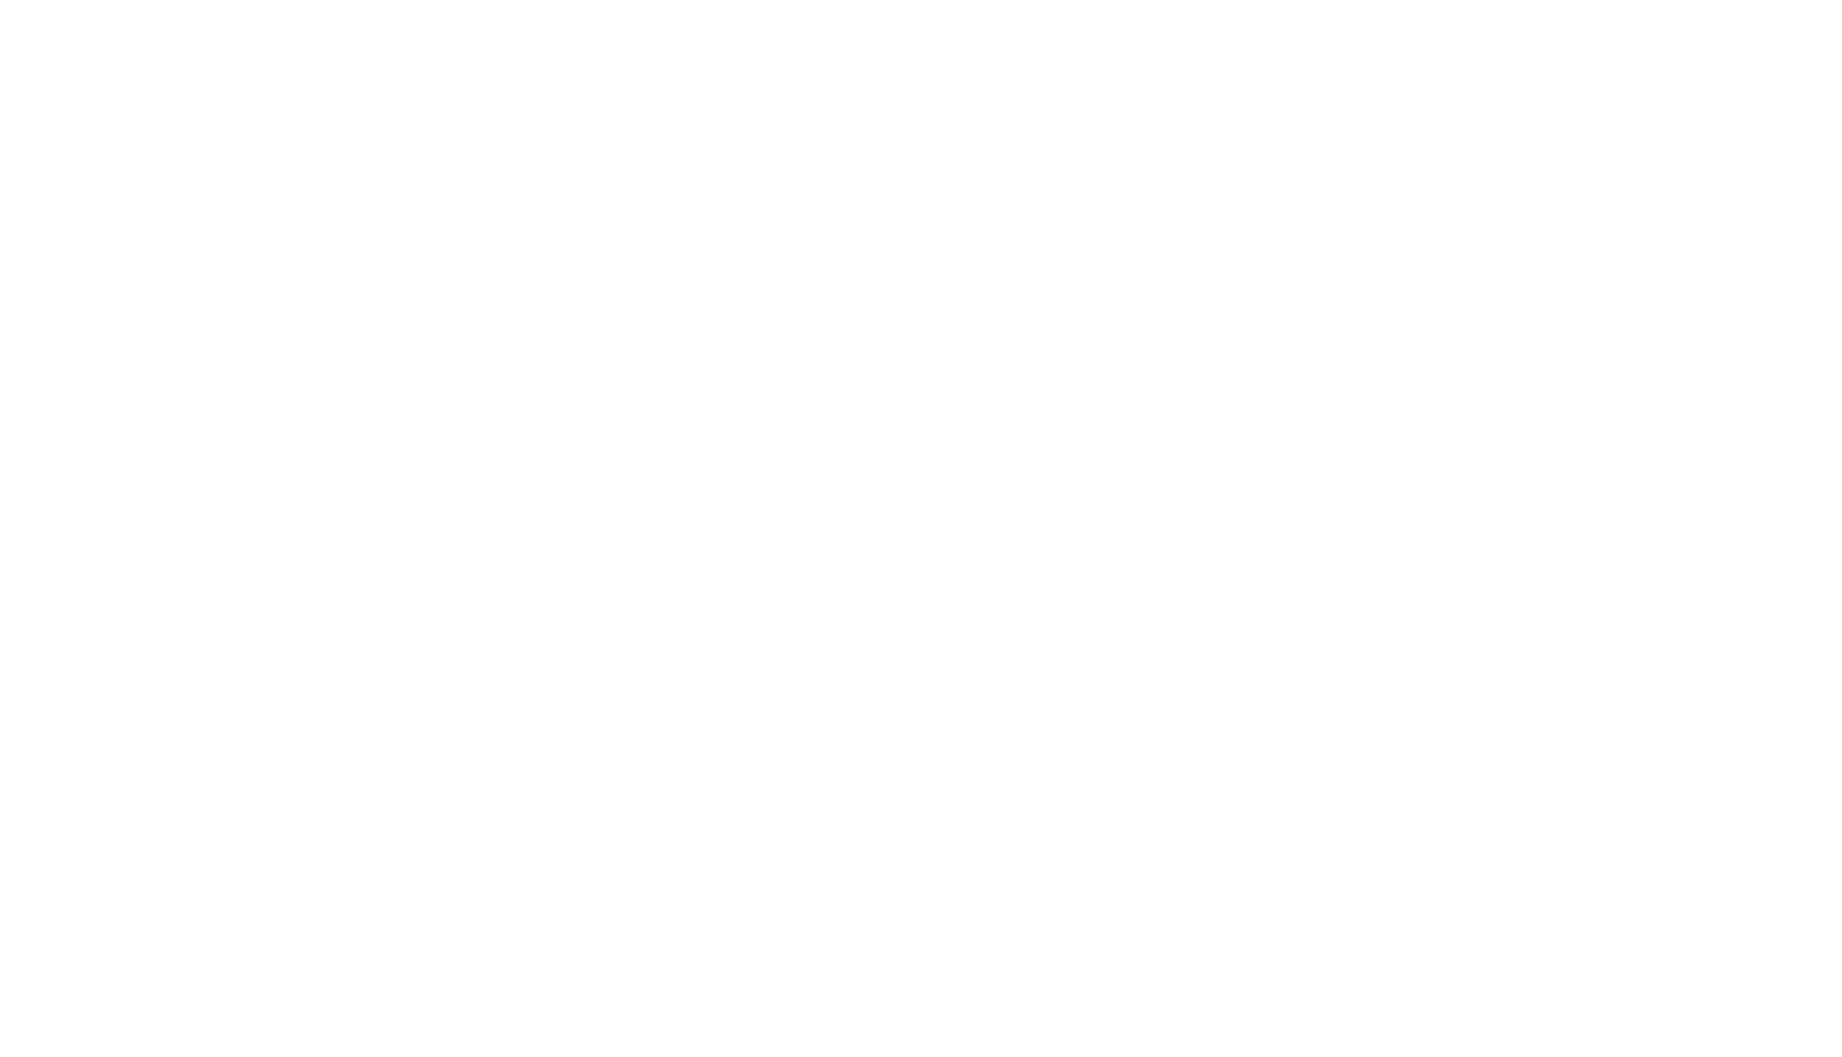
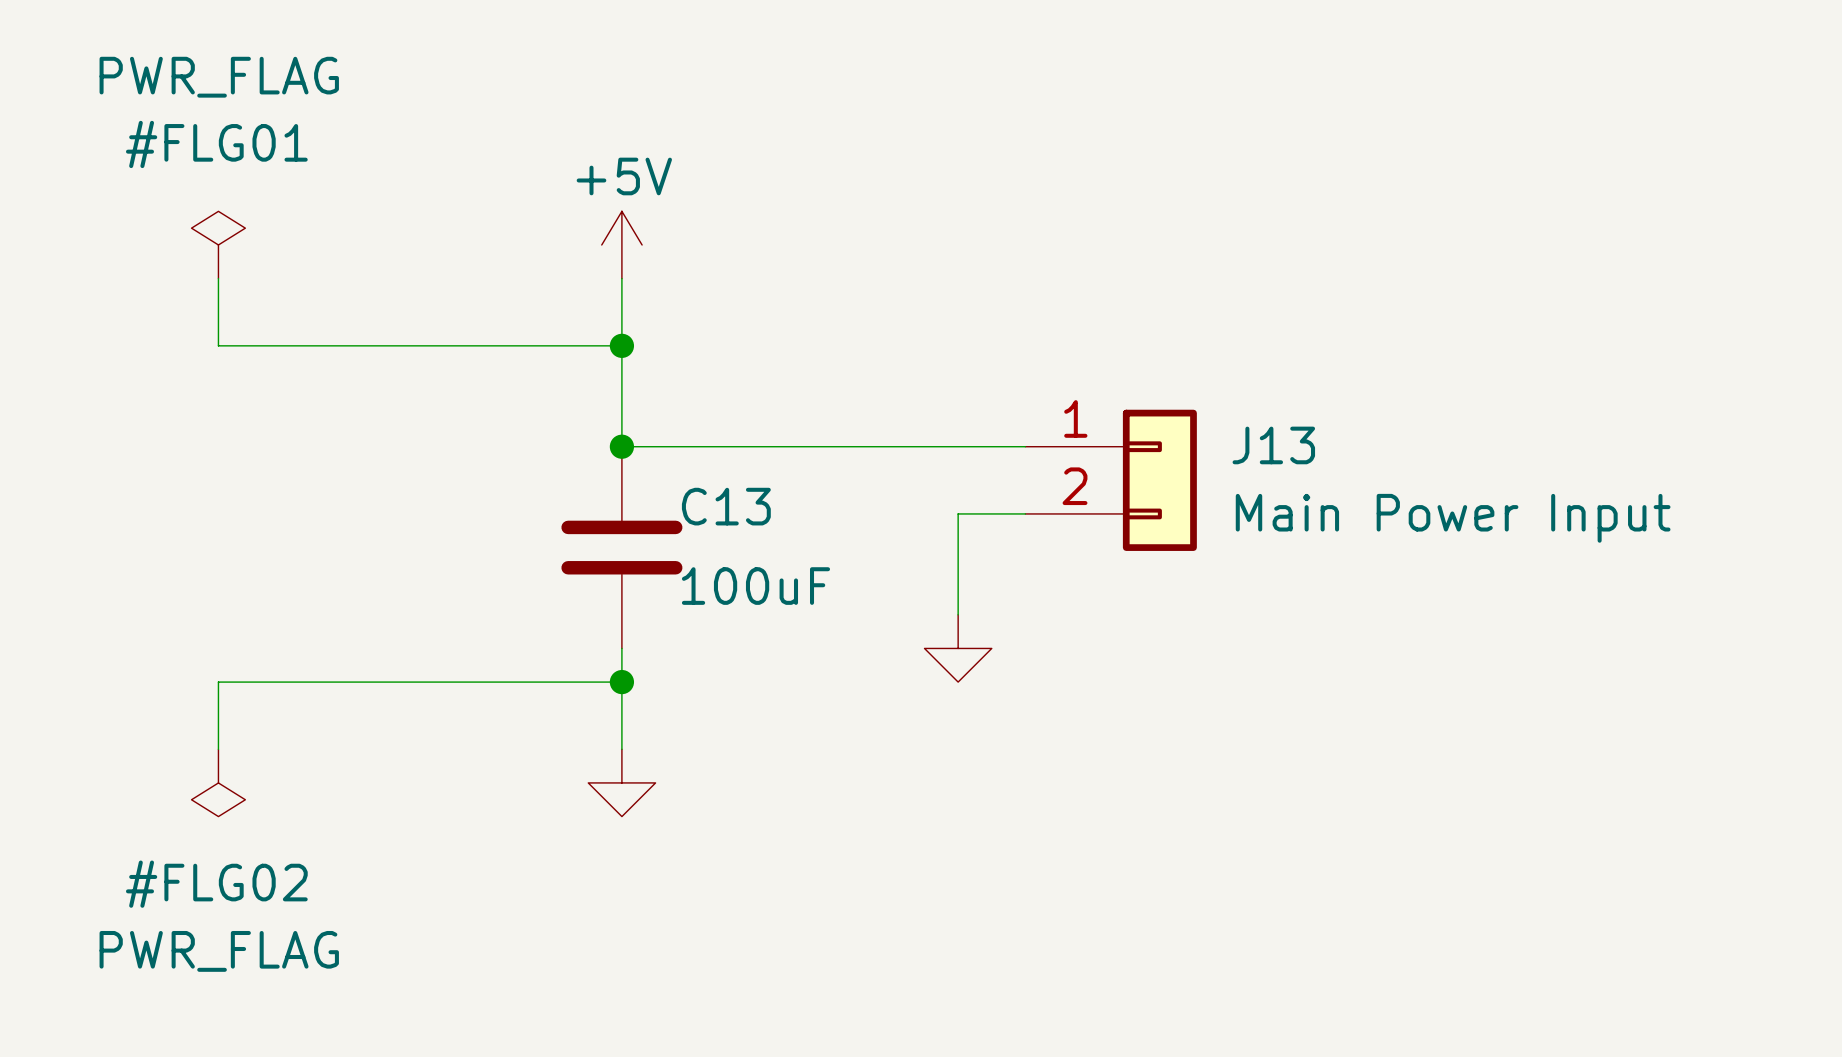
#FLG01: none -> PWR_FLAG (218, 244)
power symbol: none -> +5V (621, 244)
wire: none -> (218, 278) (218, 345) (621, 345)
wire: none -> (621, 278) (621, 446) (1025, 446)
junction: none -> (621, 345)
junction: none -> (621, 446)
J13: none -> Main Power Input (1111, 480)
wire: none -> (1025, 513) (958, 513) (958, 614)
C13: none -> 100uF (621, 547)
wire: none -> (621, 648) (621, 749)
power symbol: none -> (958, 648)
wire: none -> (621, 682) (218, 682) (218, 749)
junction: none -> (621, 682)
#FLG02: none -> PWR_FLAG (218, 782)
power symbol: none -> (621, 782)

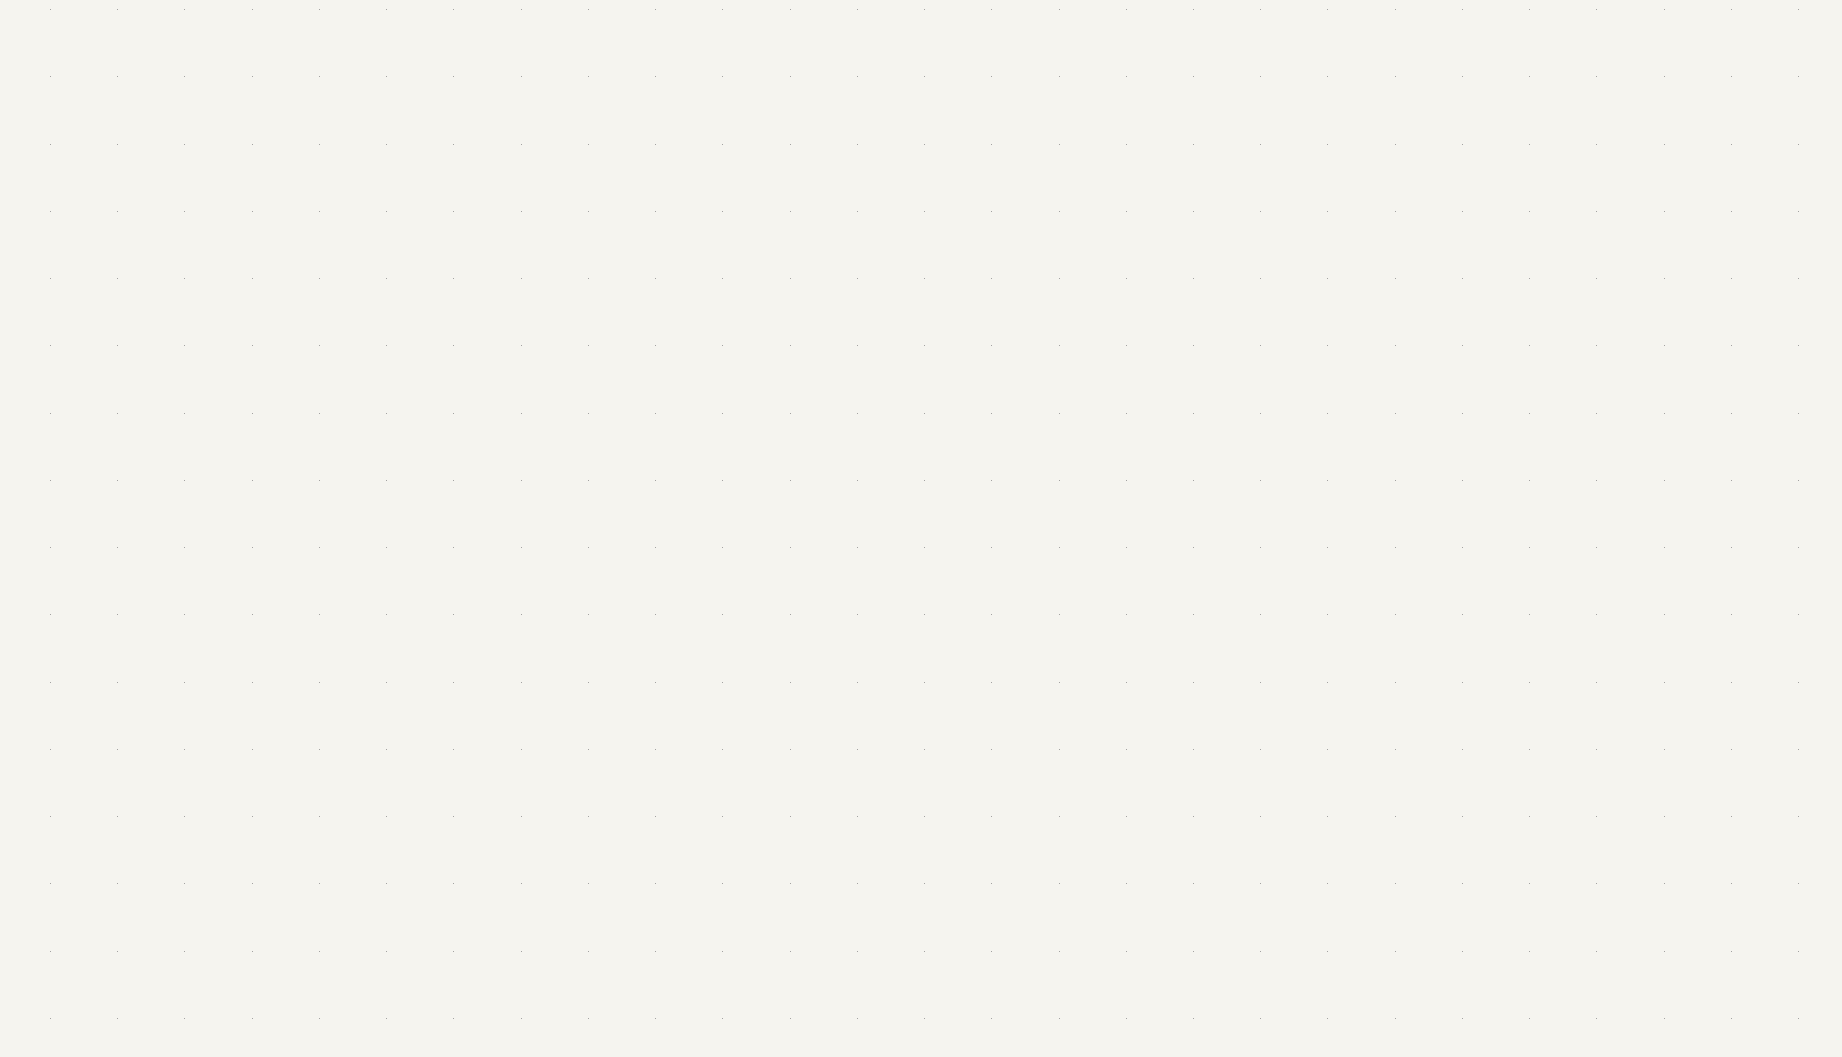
#FLG01: PWR_FLAG (218, 244) -> none
power symbol: +5V (621, 244) -> none
wire: (218, 278) (218, 345) (621, 345) -> none
wire: (621, 278) (621, 446) (1025, 446) -> none
junction: (621, 345) -> none
junction: (621, 446) -> none
J13: Main Power Input (1111, 480) -> none
wire: (1025, 513) (958, 513) (958, 614) -> none
C13: 100uF (621, 547) -> none
wire: (621, 648) (621, 749) -> none
power symbol: (958, 648) -> none
wire: (621, 682) (218, 682) (218, 749) -> none
junction: (621, 682) -> none
#FLG02: PWR_FLAG (218, 782) -> none
power symbol: (621, 782) -> none

